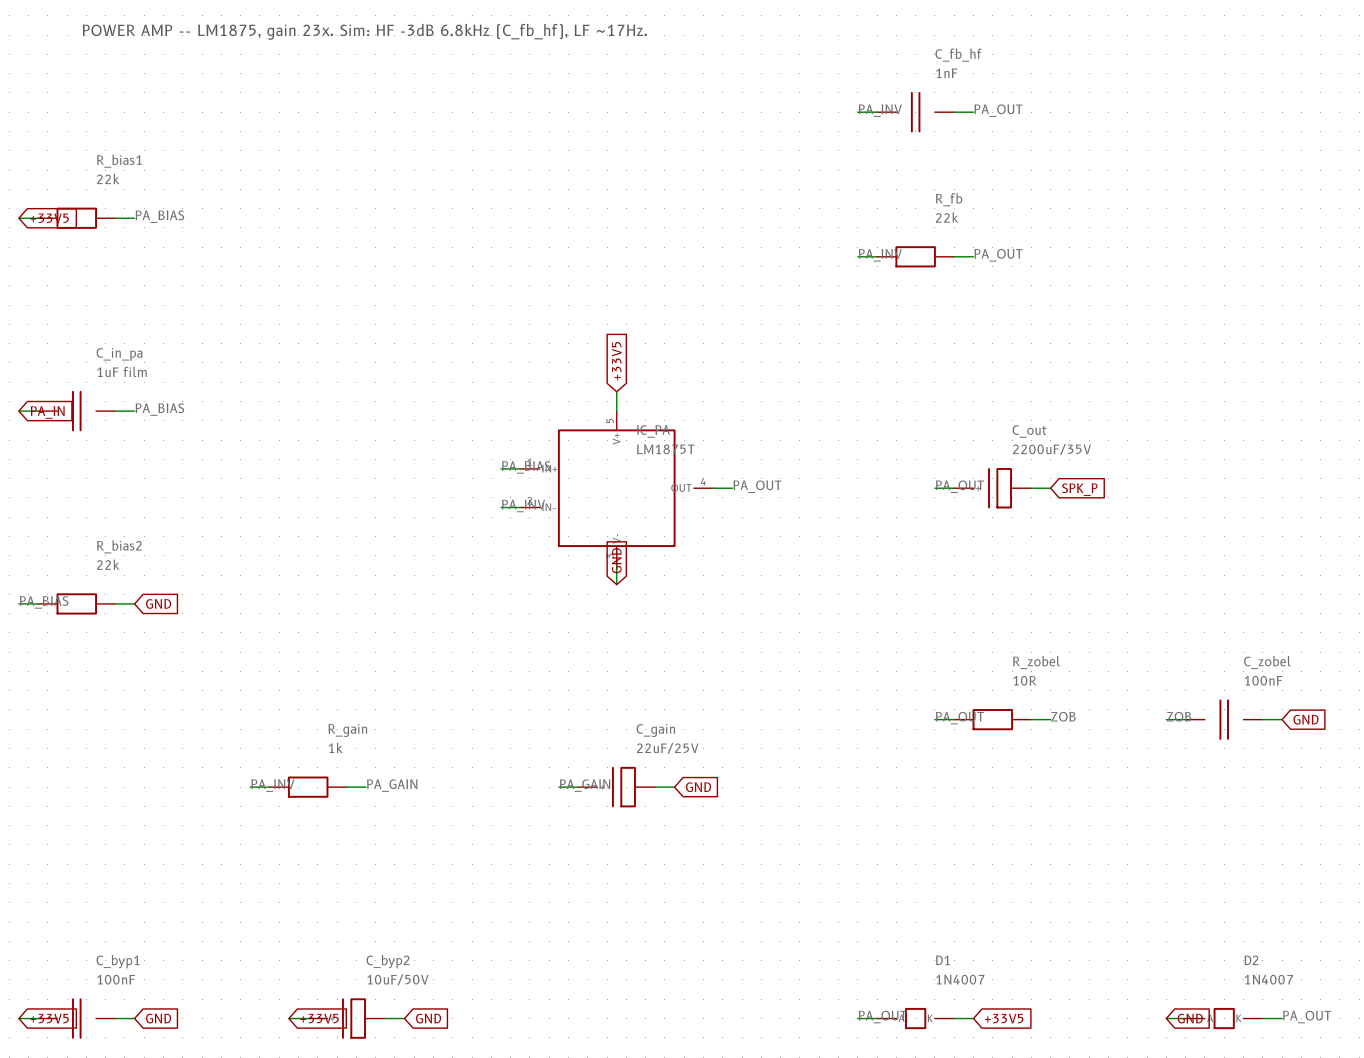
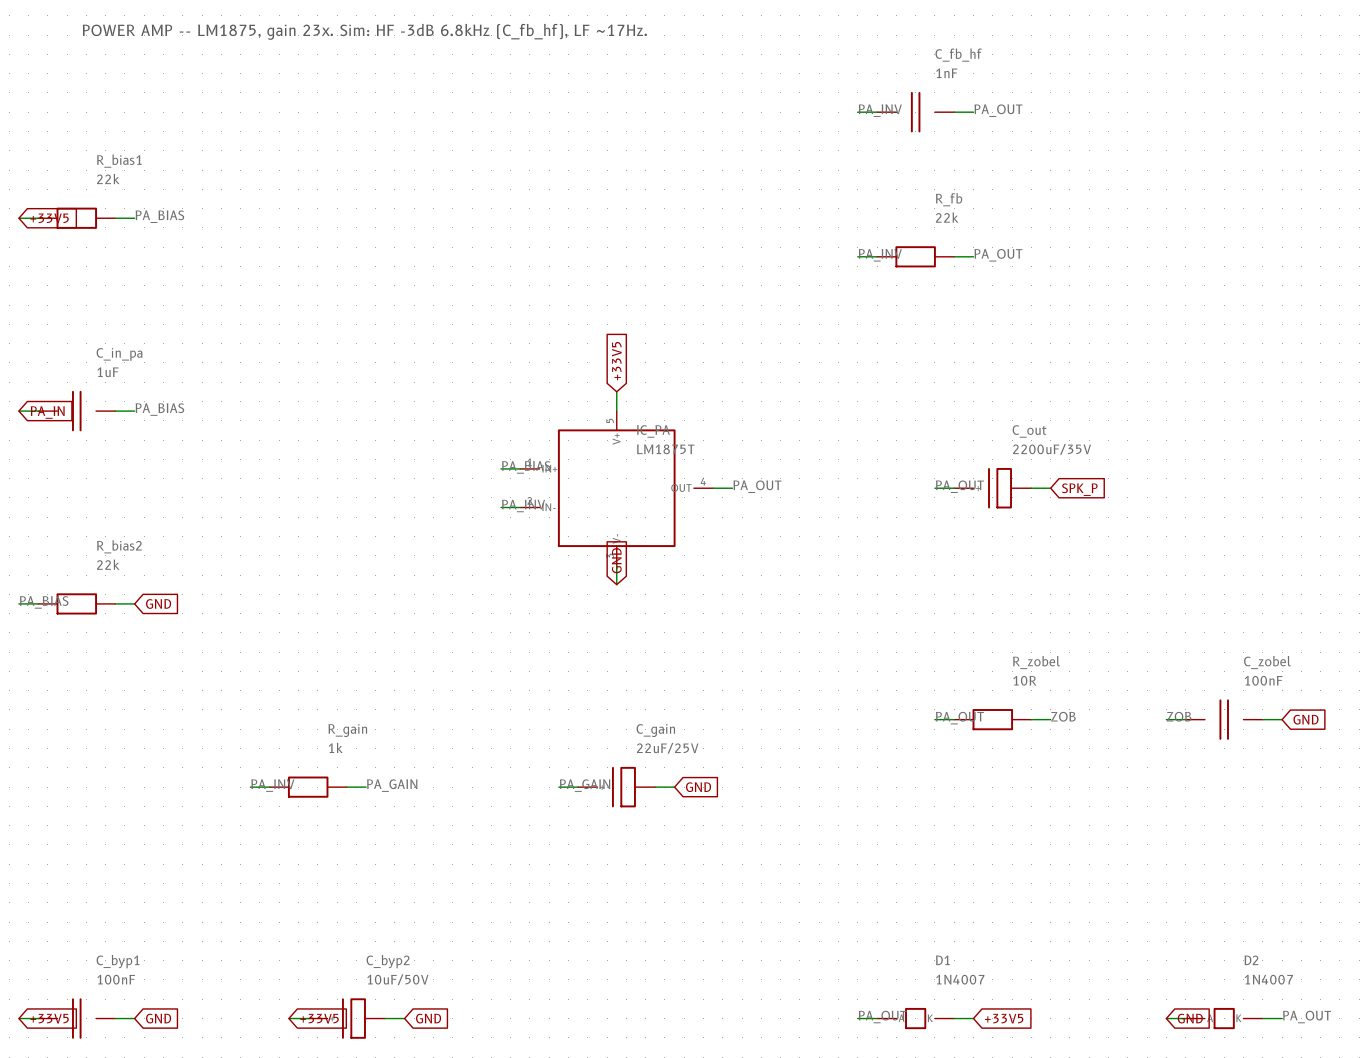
C_in_pa value: 1uF film (122, 371) -> 1uF (107, 372)

